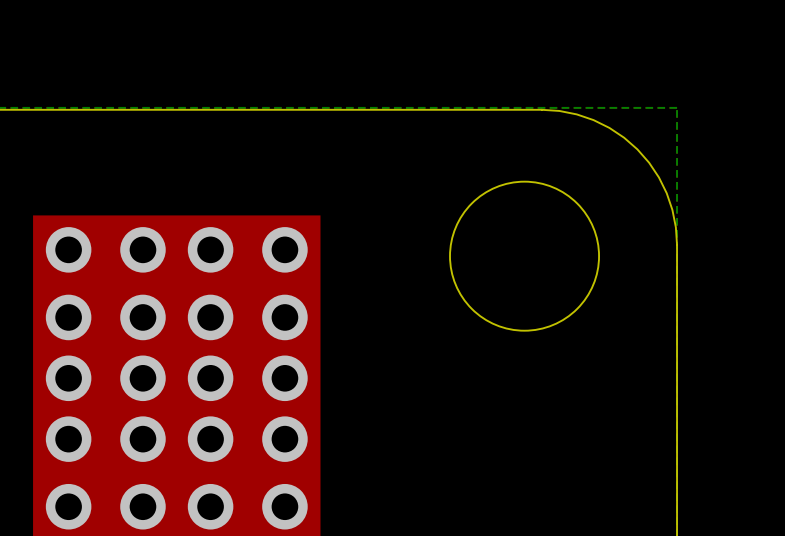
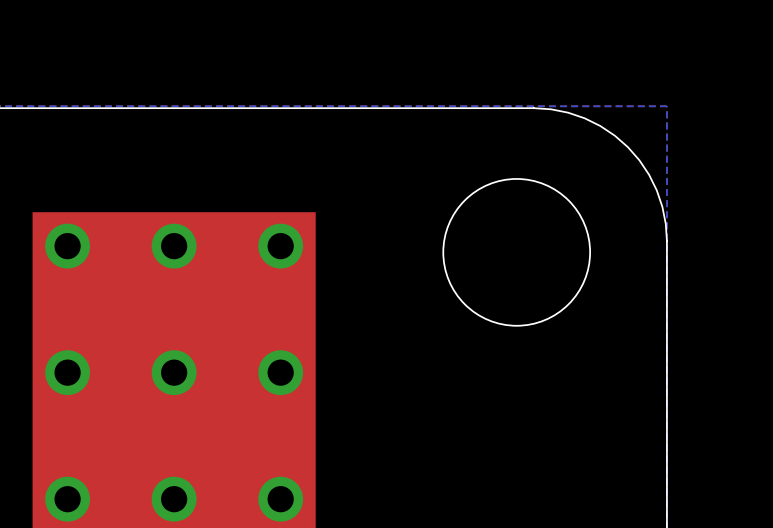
via: (142, 249) -> none
via: none -> (174, 246)
via: (210, 249) -> none
via: (68, 317) -> none
via: (142, 317) -> none
via: (210, 317) -> none
via: (284, 317) -> none
via: (142, 378) -> none
via: none -> (174, 372)
via: (210, 378) -> none
via: (68, 439) -> none
via: (142, 439) -> none
via: (210, 439) -> none
via: (284, 439) -> none
via: (142, 506) -> none
via: none -> (174, 499)
via: (210, 506) -> none

